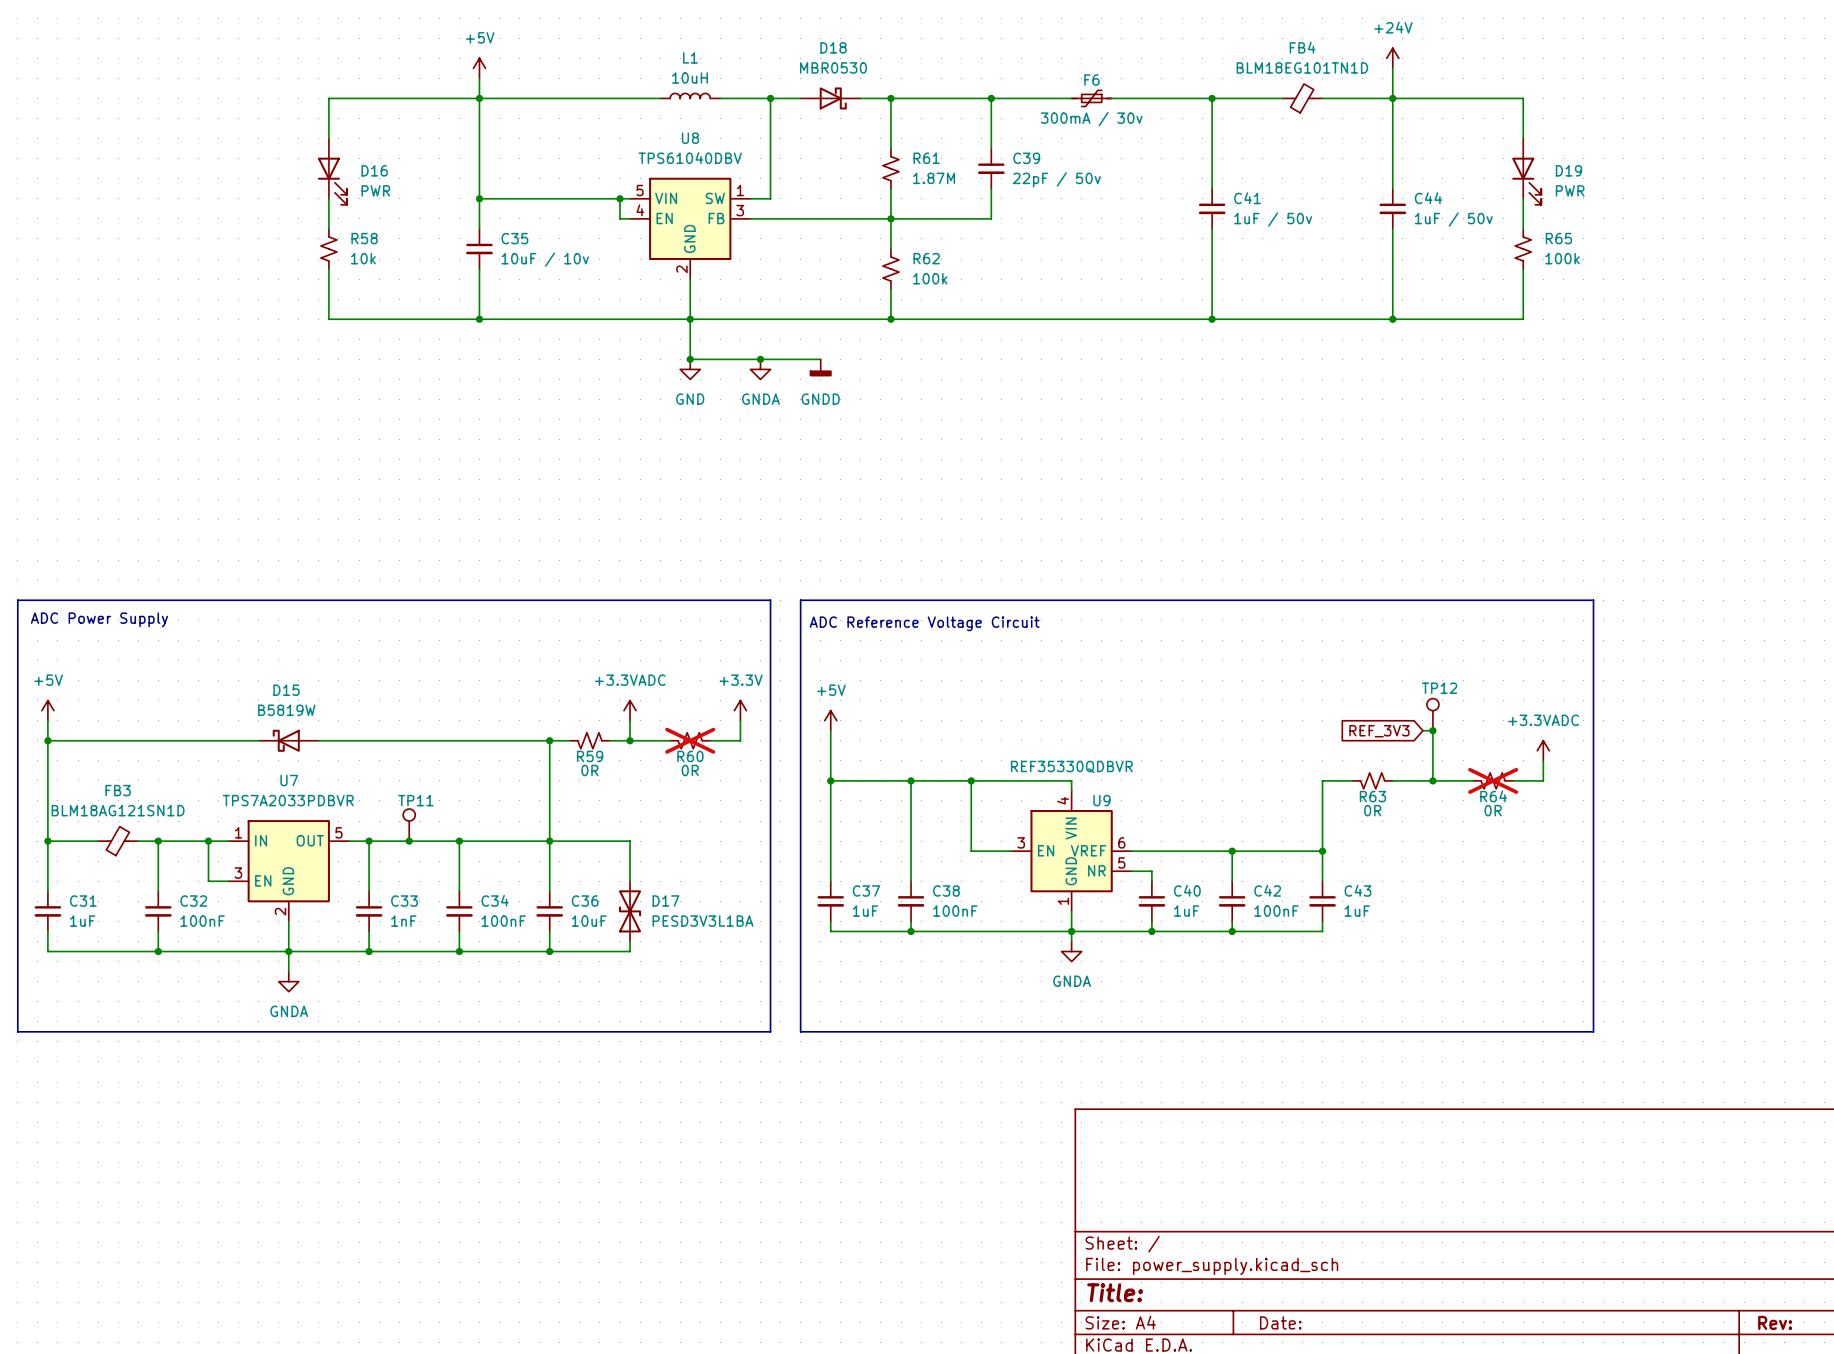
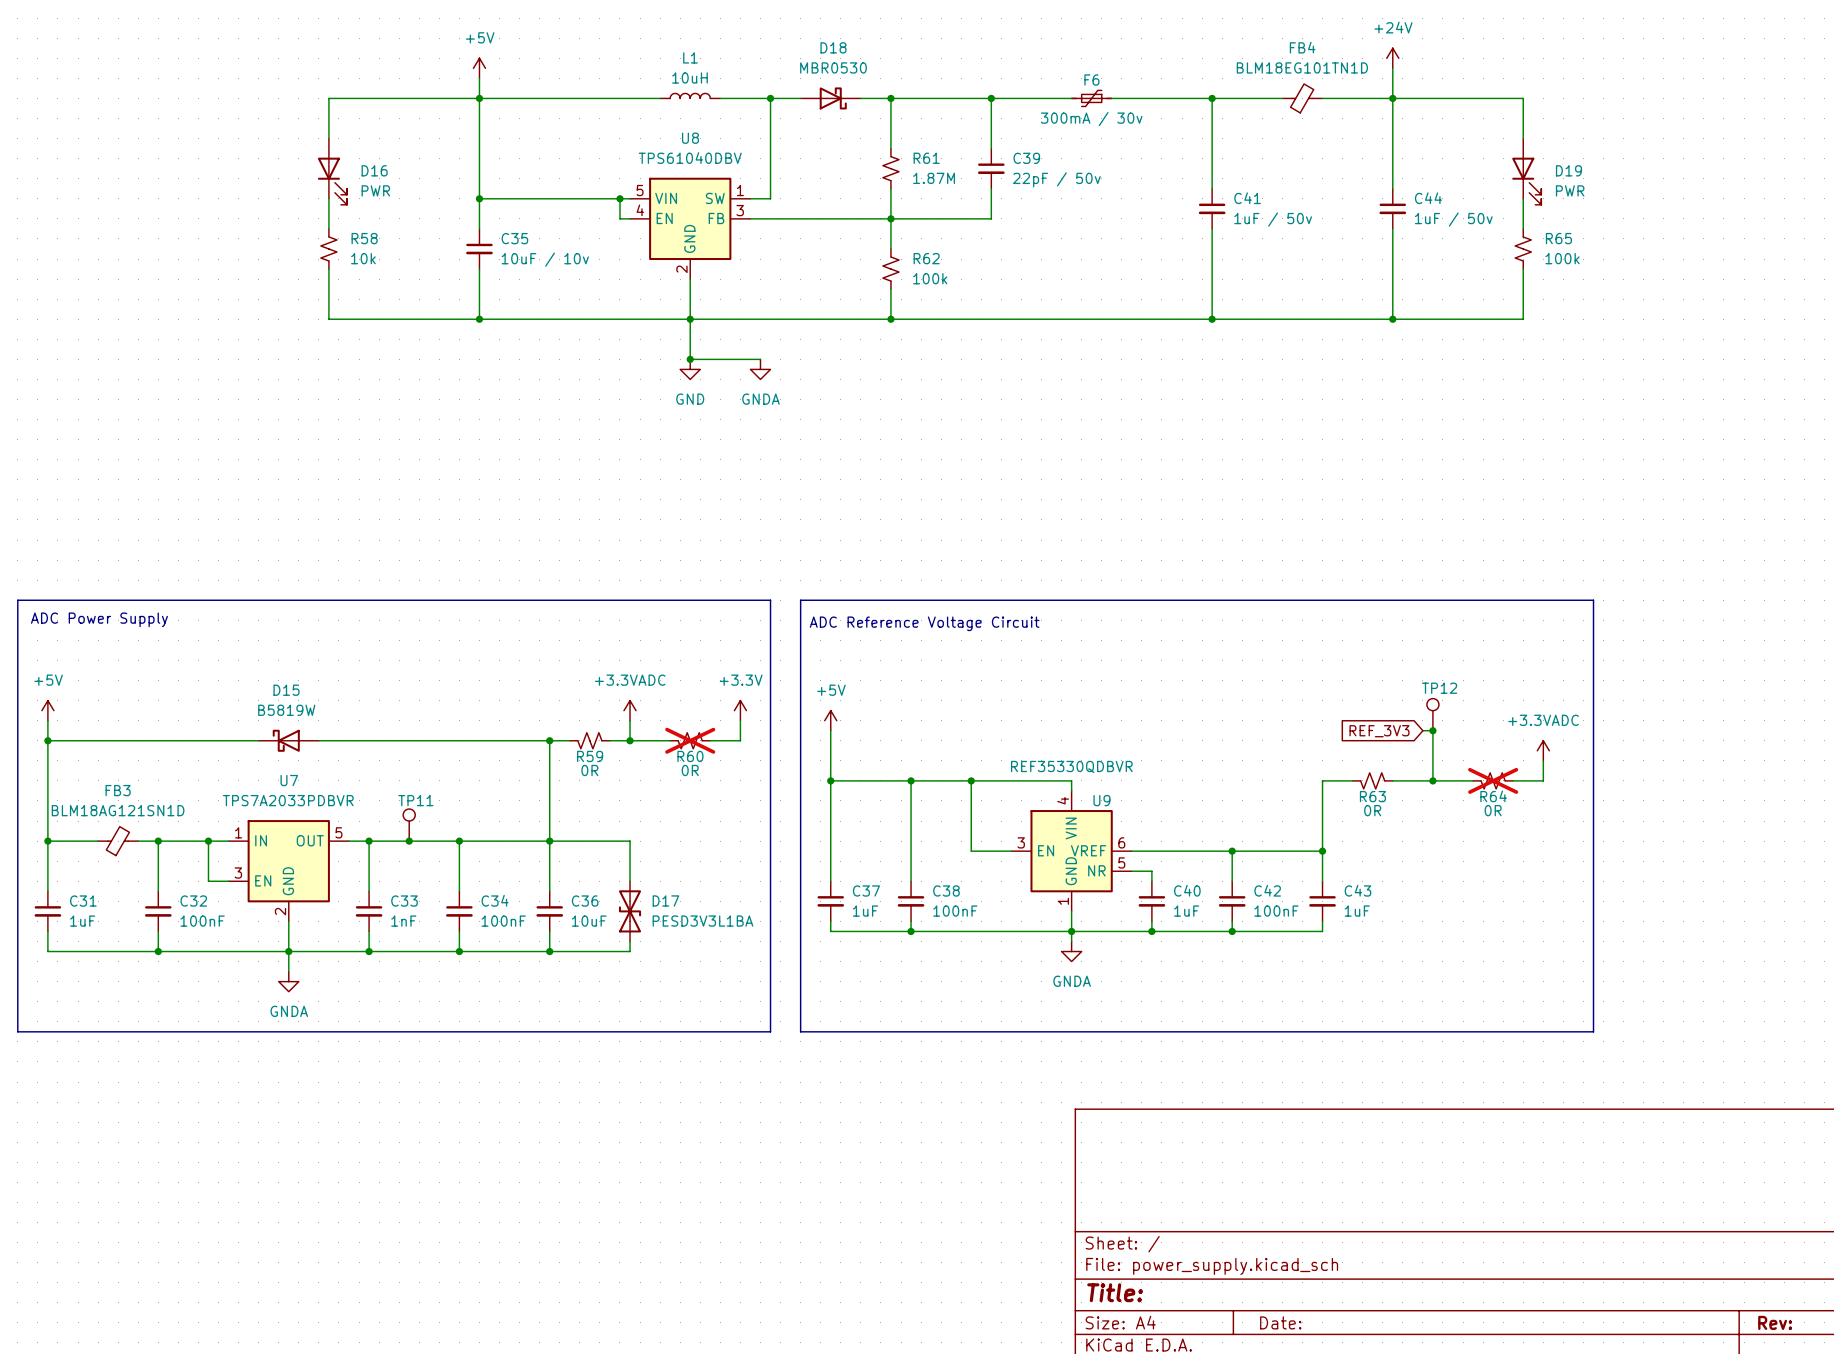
wire: (760, 359) (820, 359) -> none
junction: (760, 359) -> none
power symbol: GNDD (820, 367) -> none

